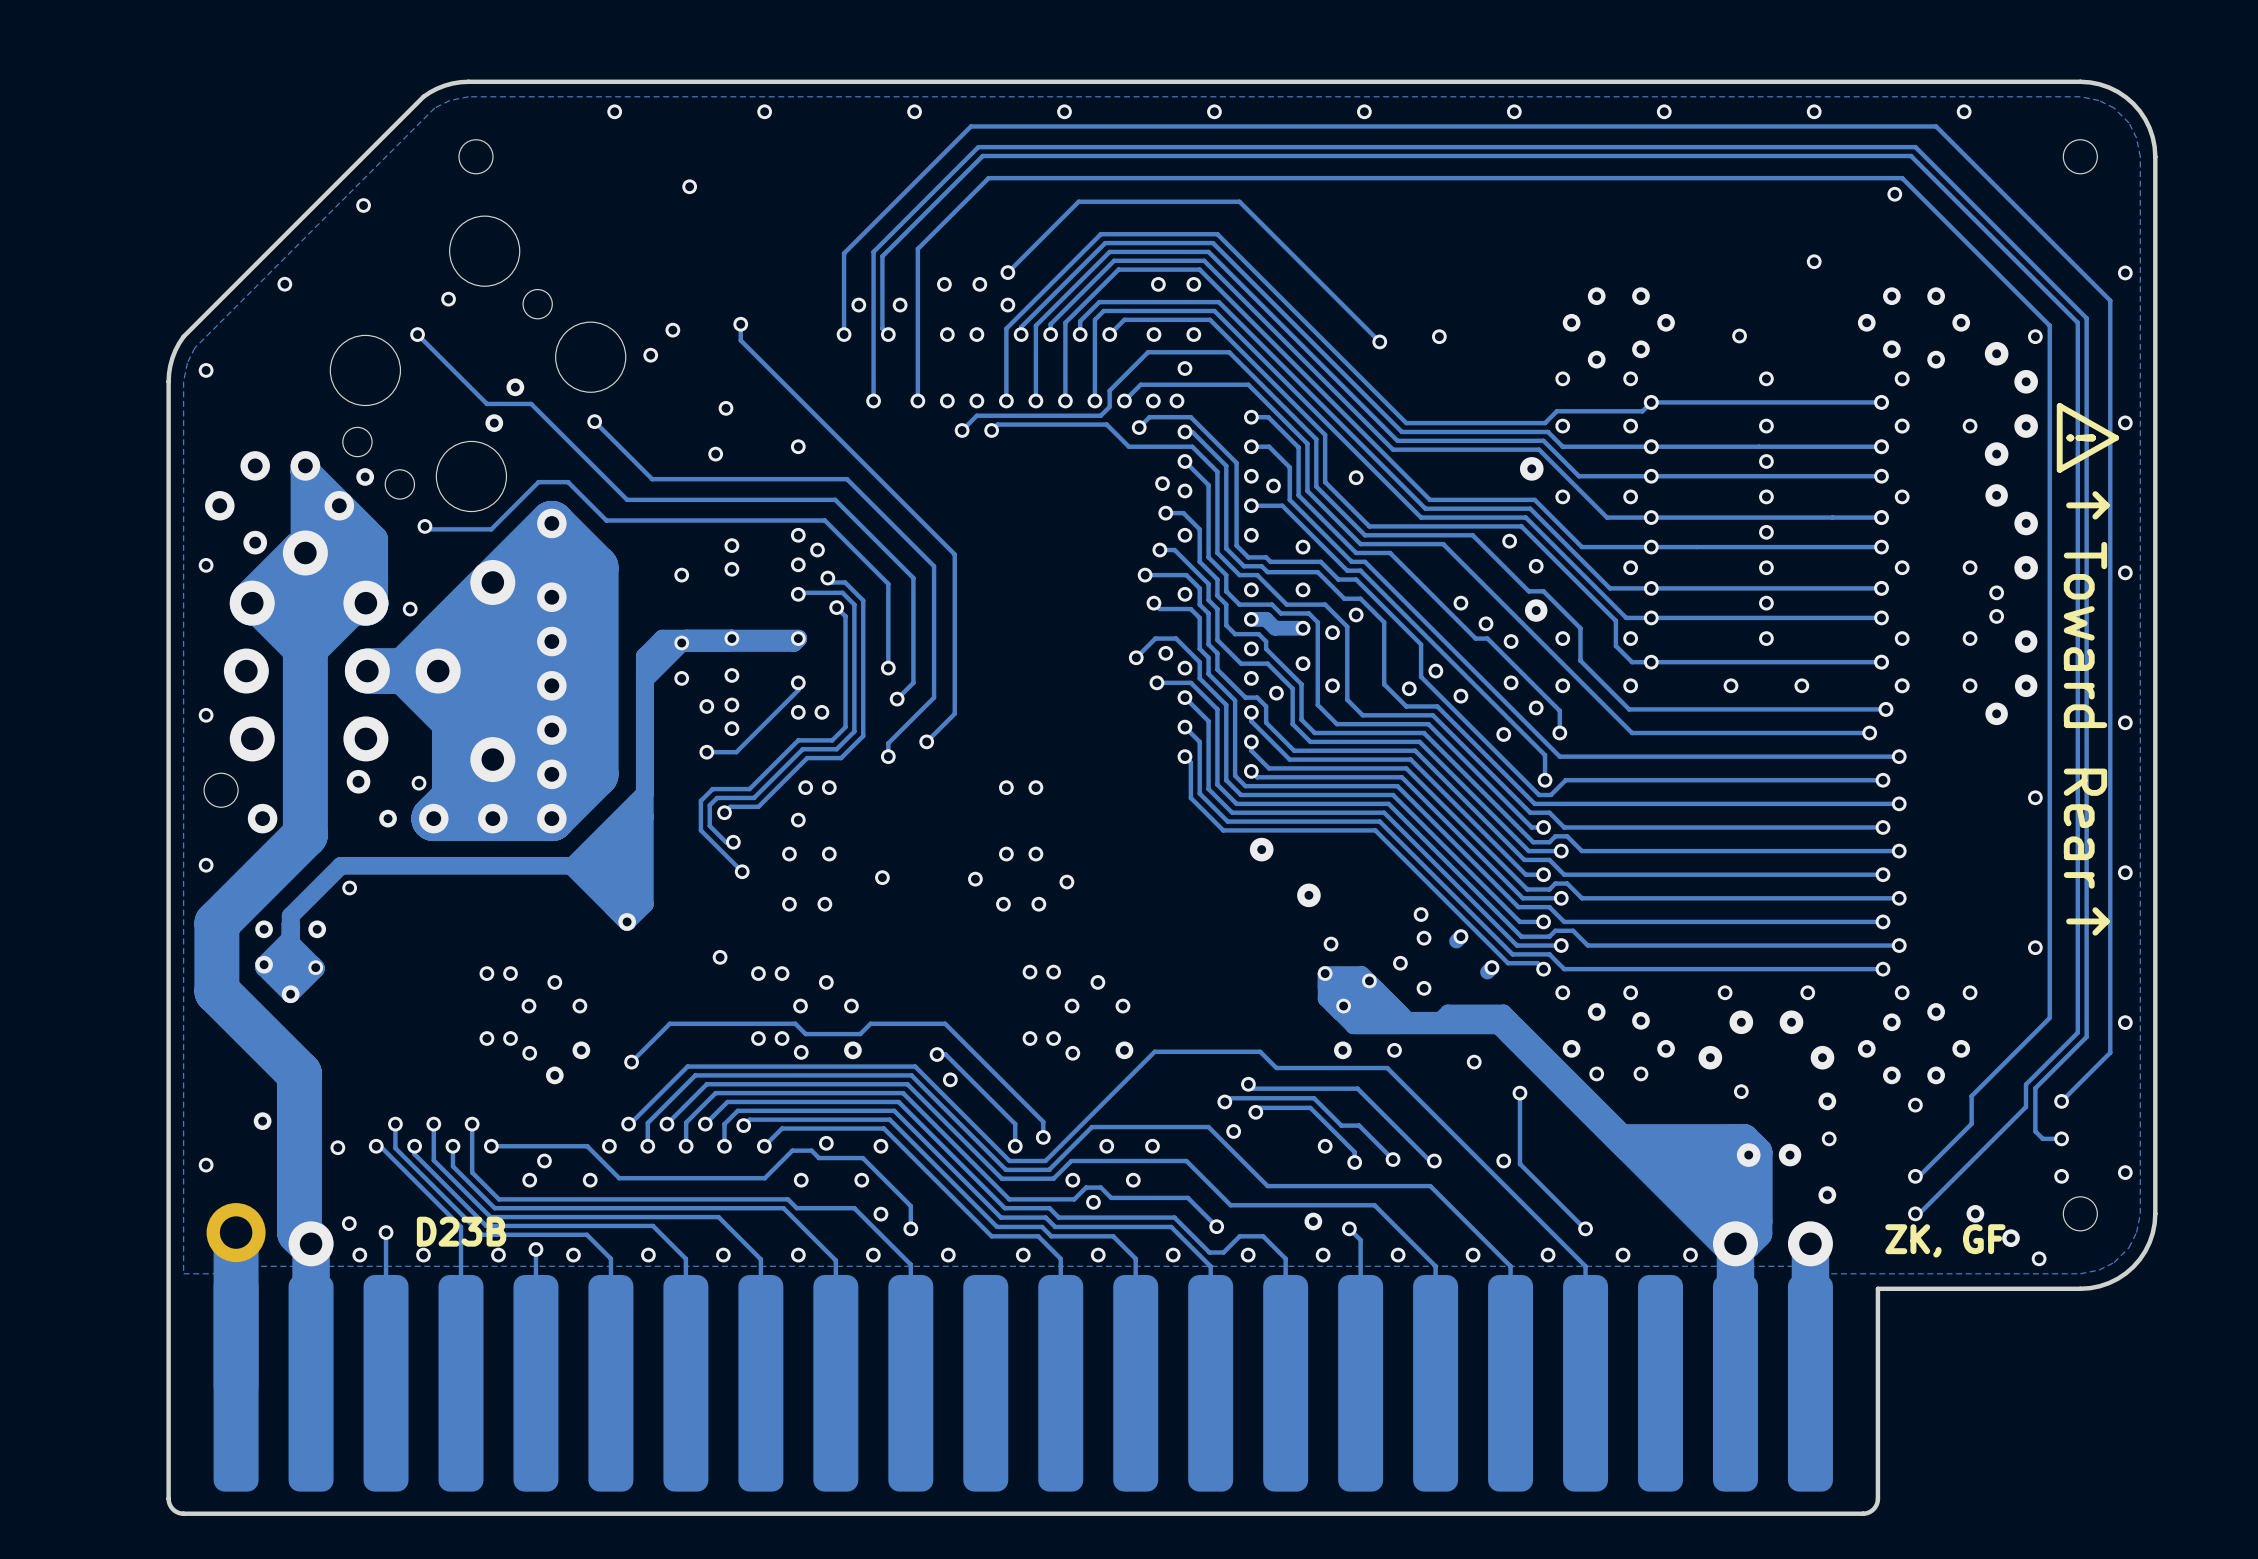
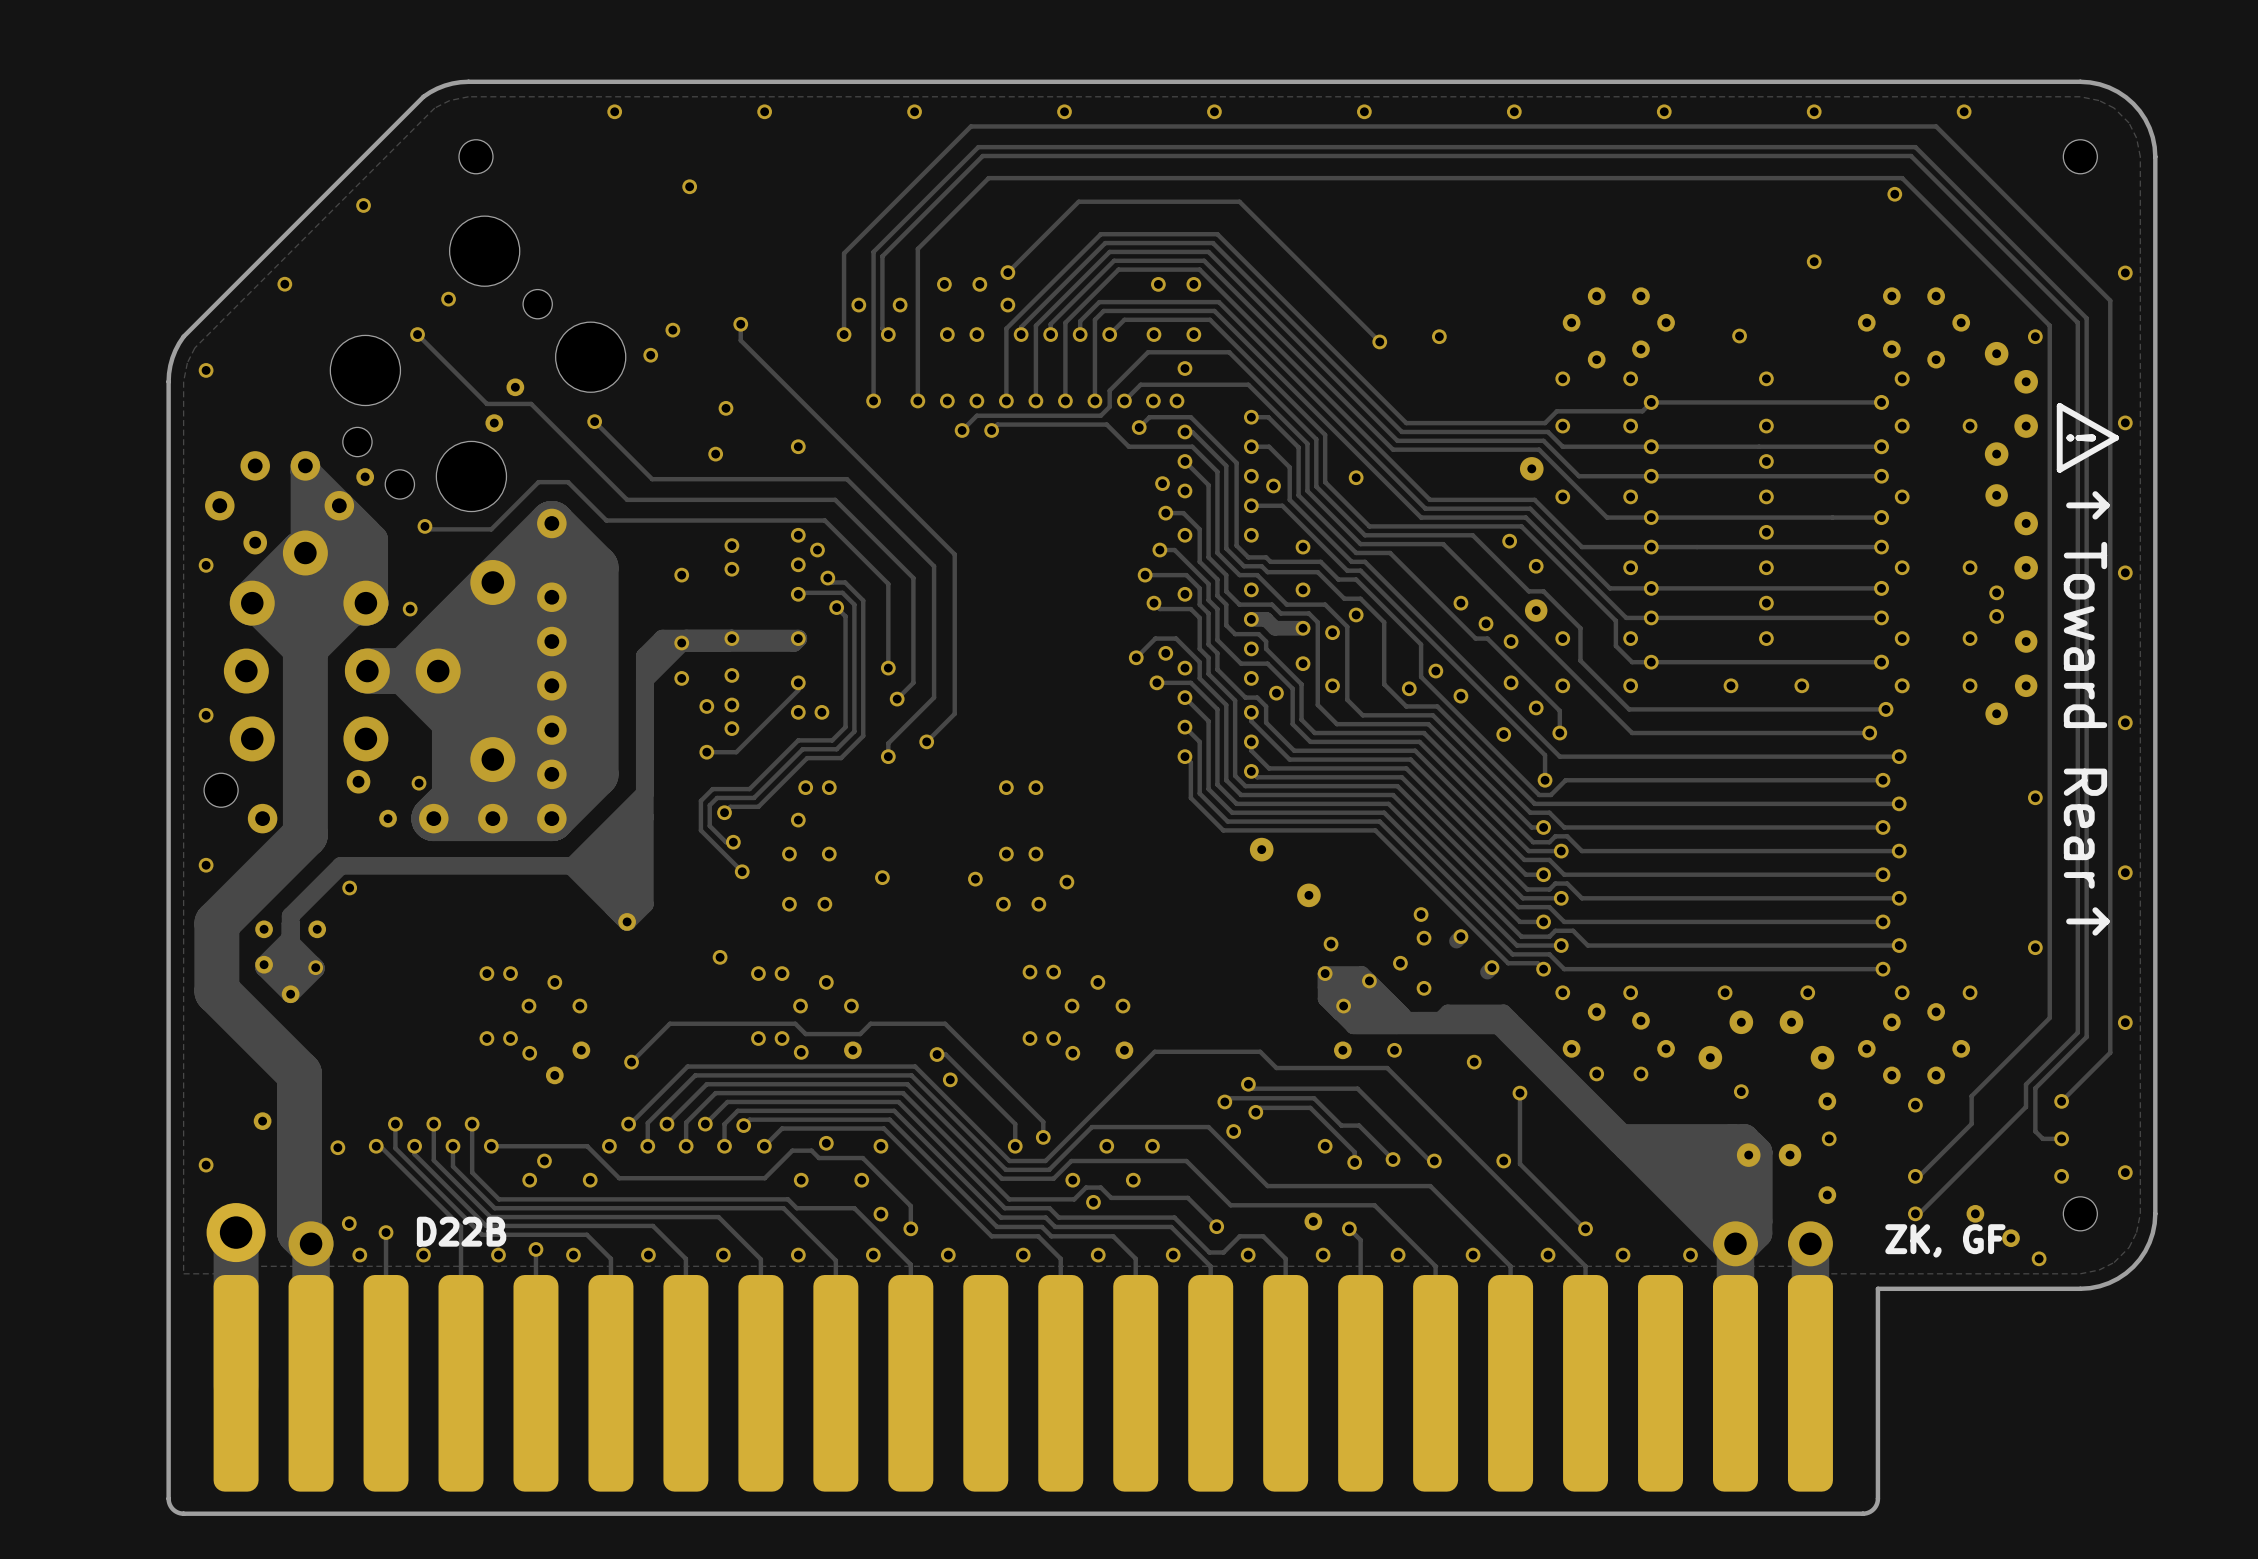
text: D23B (461, 1231) -> D22B (461, 1231)

